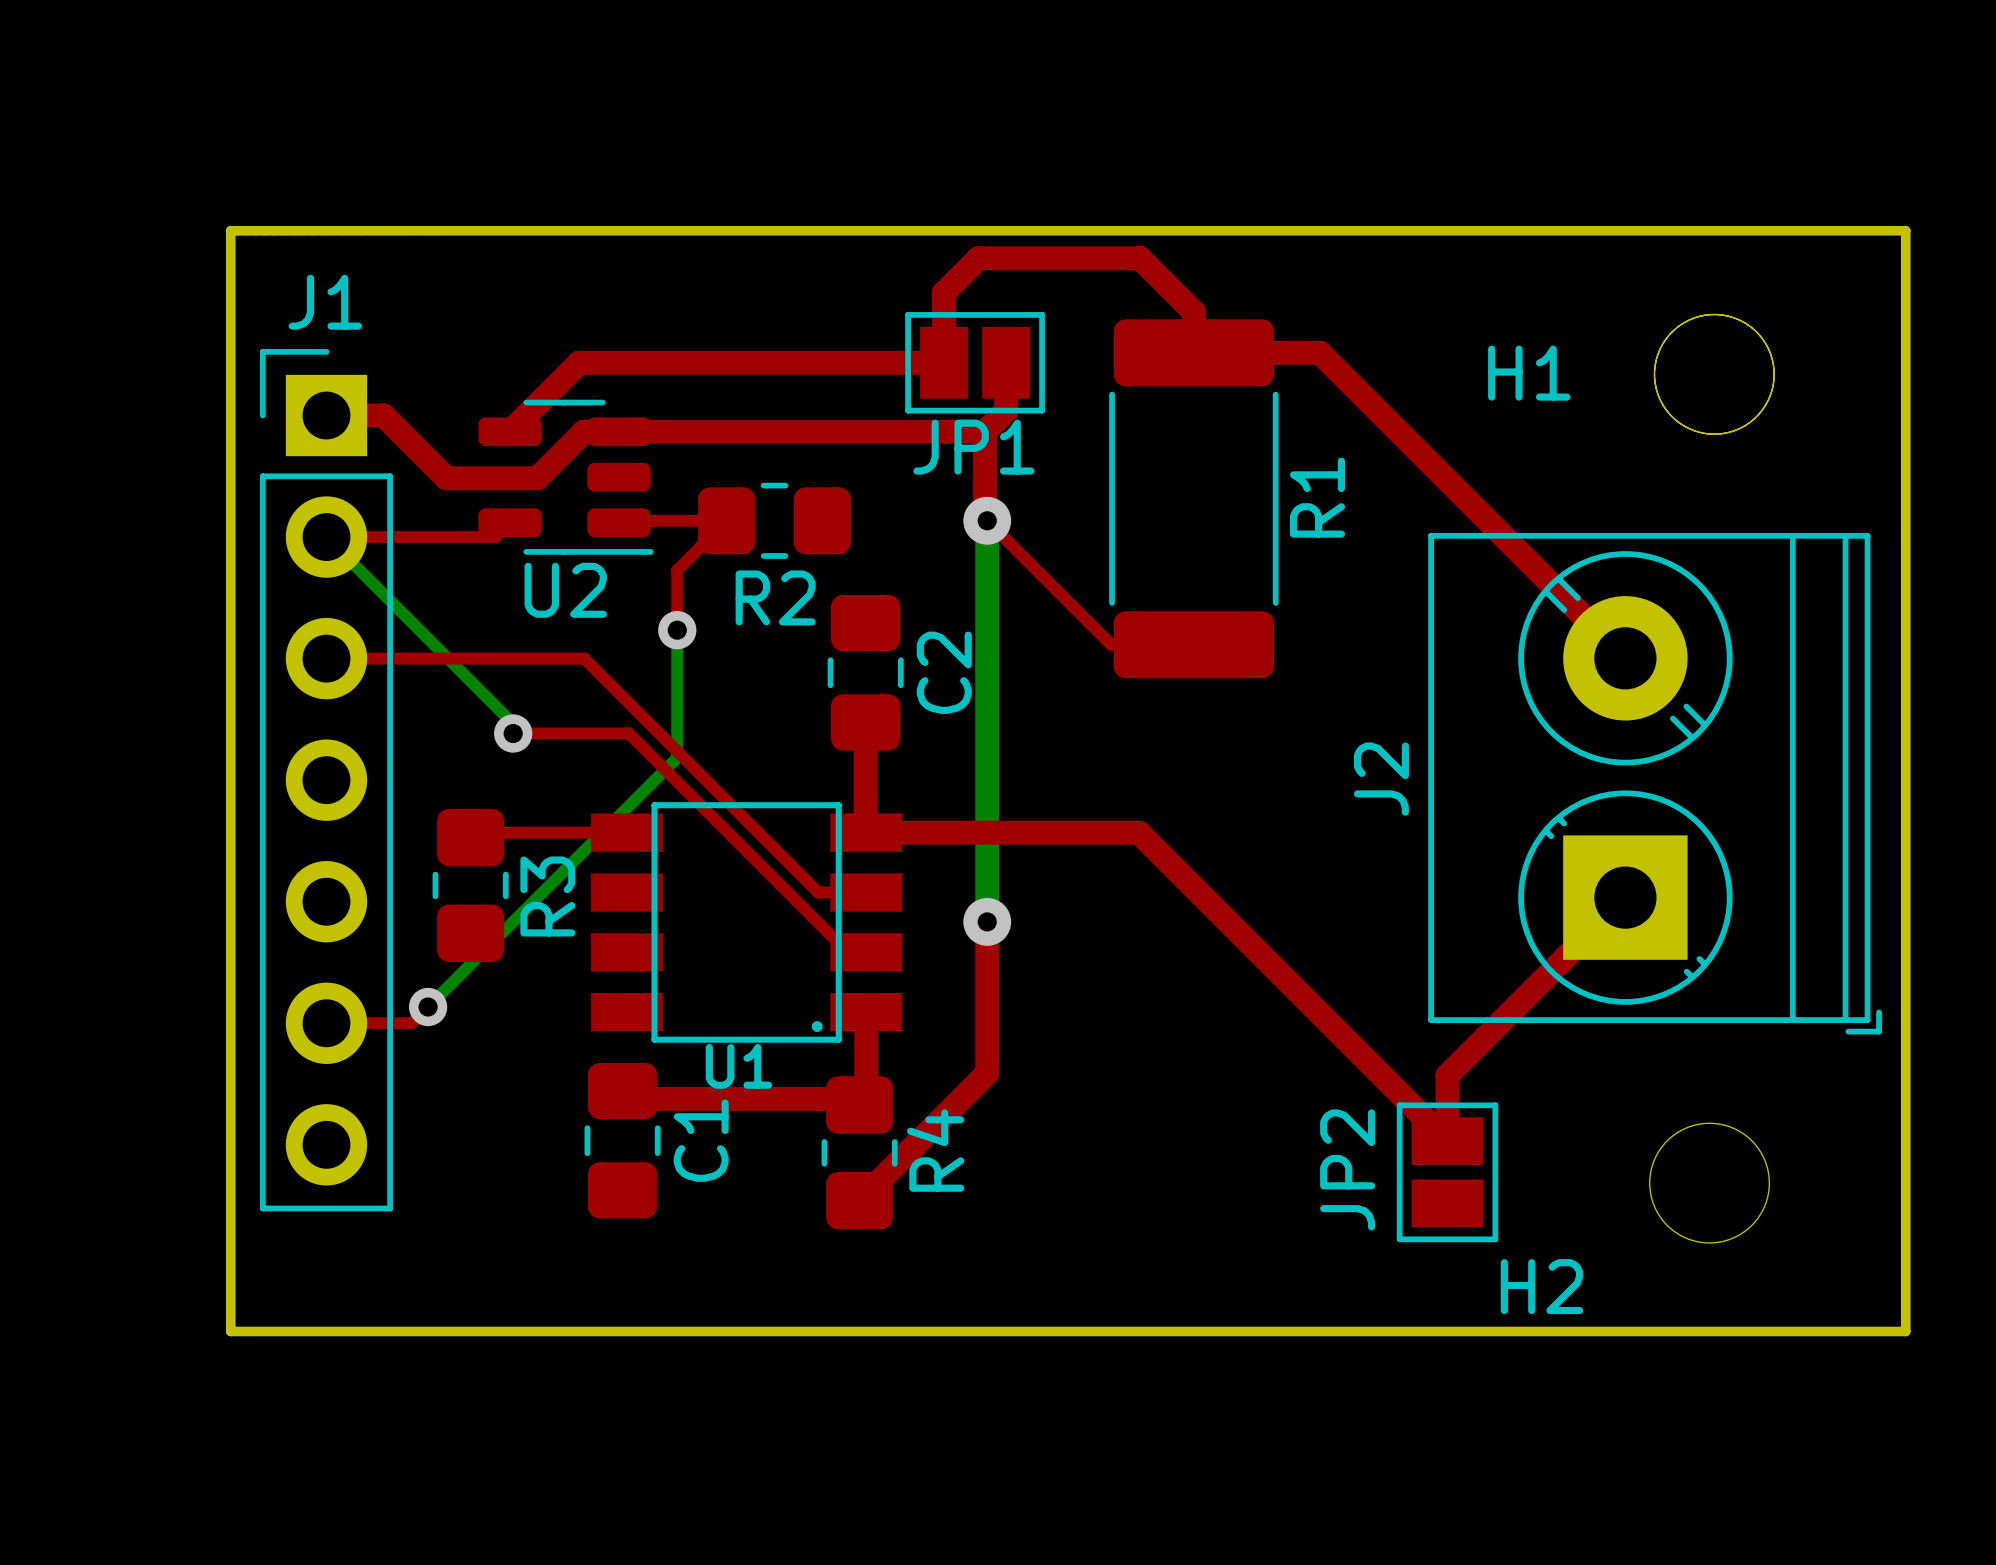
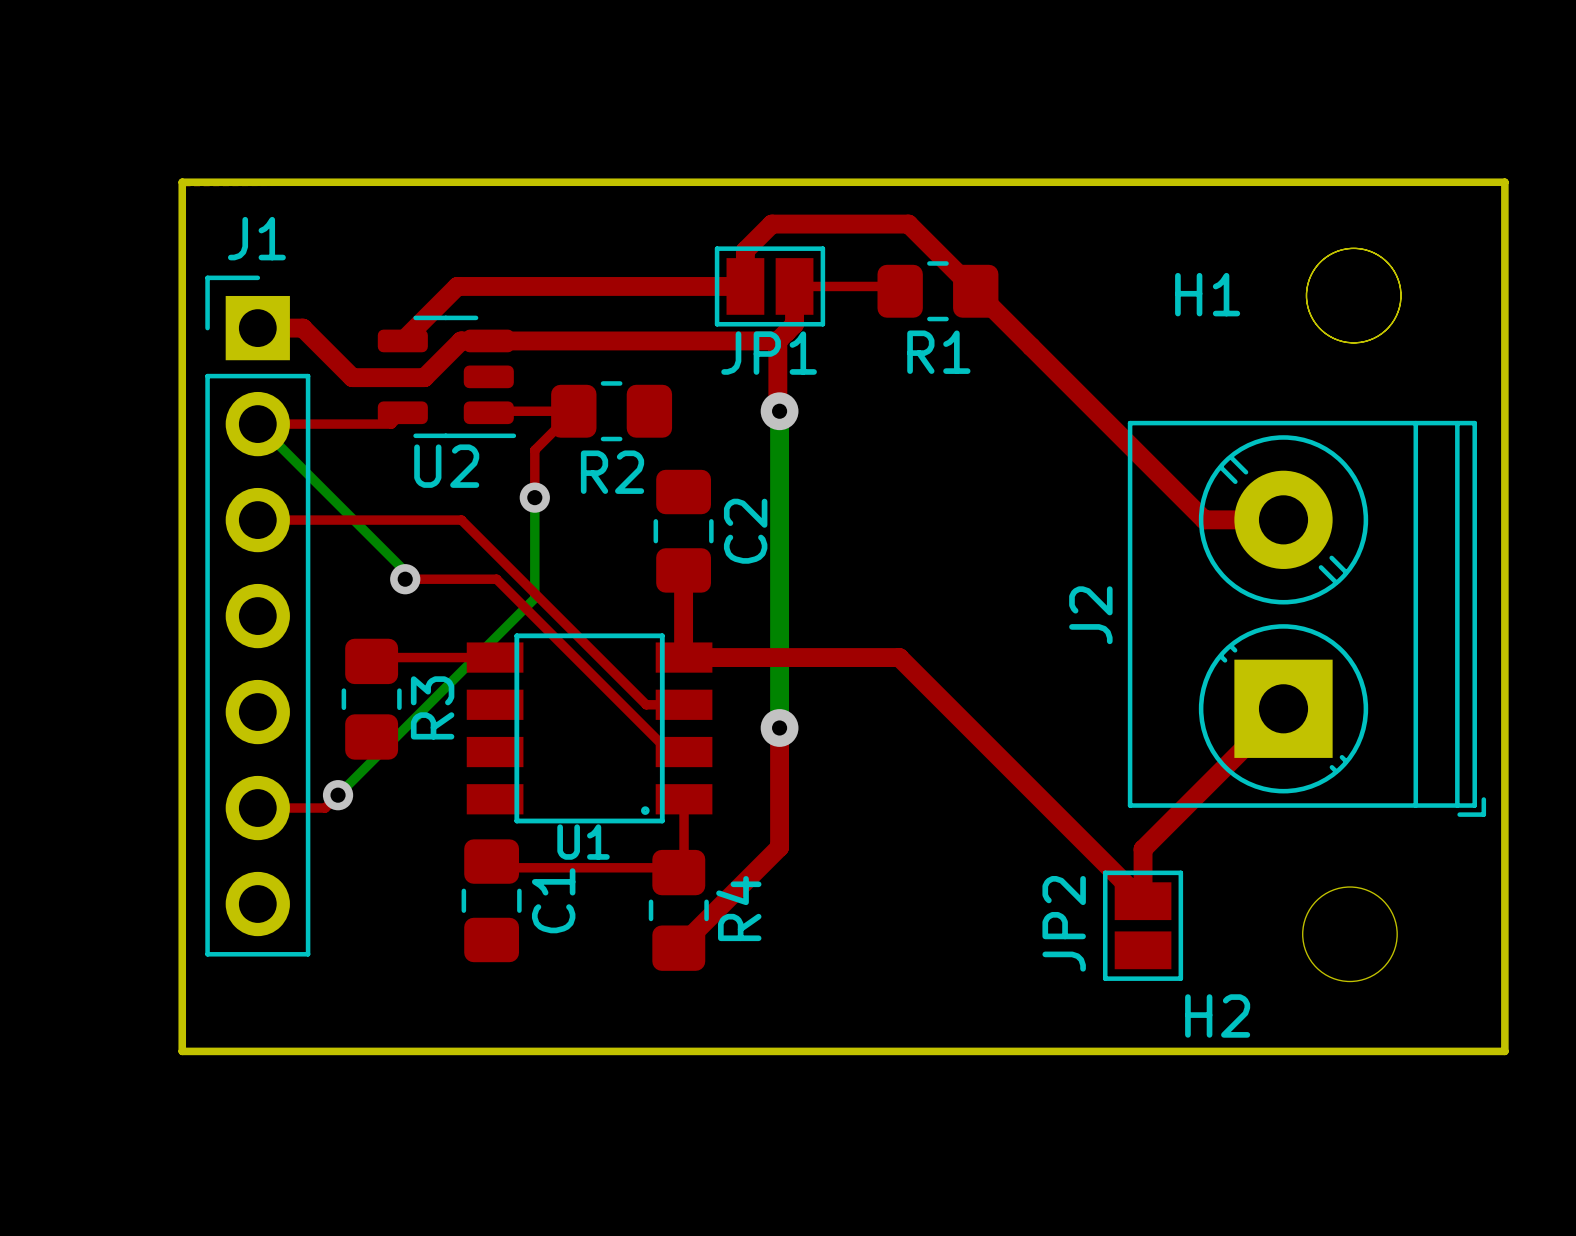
top track: (943, 317) (943, 292) (978, 258) (1140, 258) (1193, 312) (1193, 352) (1319, 352) (1625, 658) -> (745, 250) (771, 224) (908, 224) (1204, 519) (1283, 519)
R1 footprint: [1109, 319, 1279, 679] -> [877, 261, 999, 322]
top track: none -> (794, 286) (895, 286) (900, 291)
R1 name position: R1 (1317, 497) -> R1 (938, 352)
top track: (987, 520) (1111, 644) (1193, 644) -> none
top track width: thick (866, 1012) (866, 1098) (859, 1105) (853, 1098) (630, 1098) (622, 1091) -> thin (684, 799) (684, 867) (678, 872) (673, 867) (497, 867) (491, 861)

